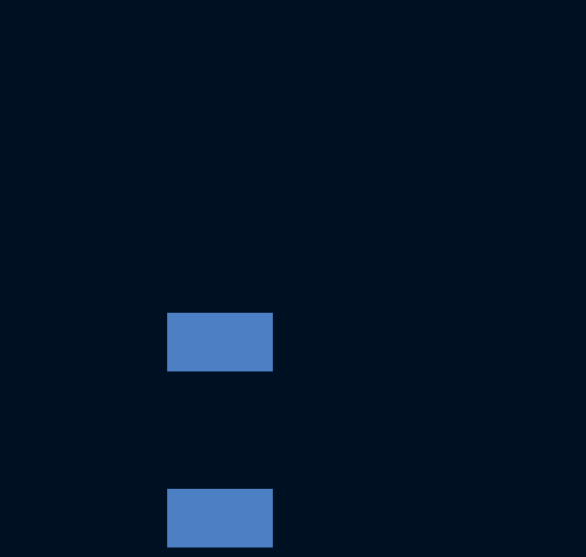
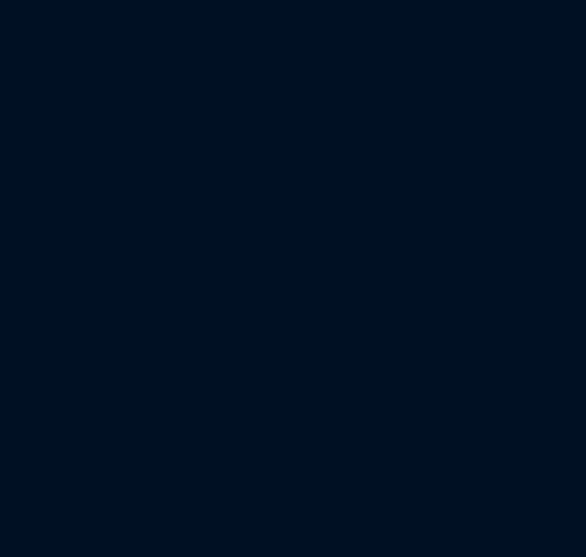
part: (219, 430) -> none

